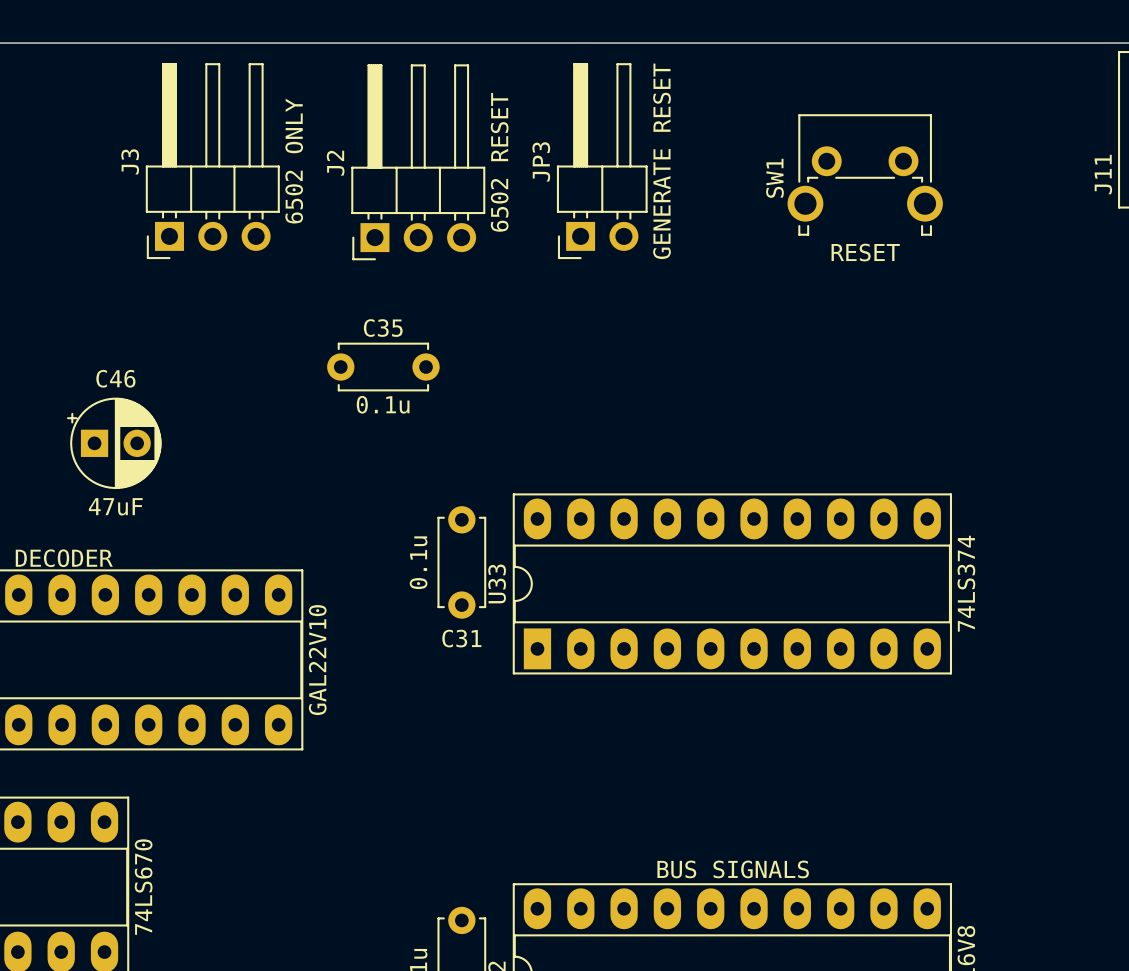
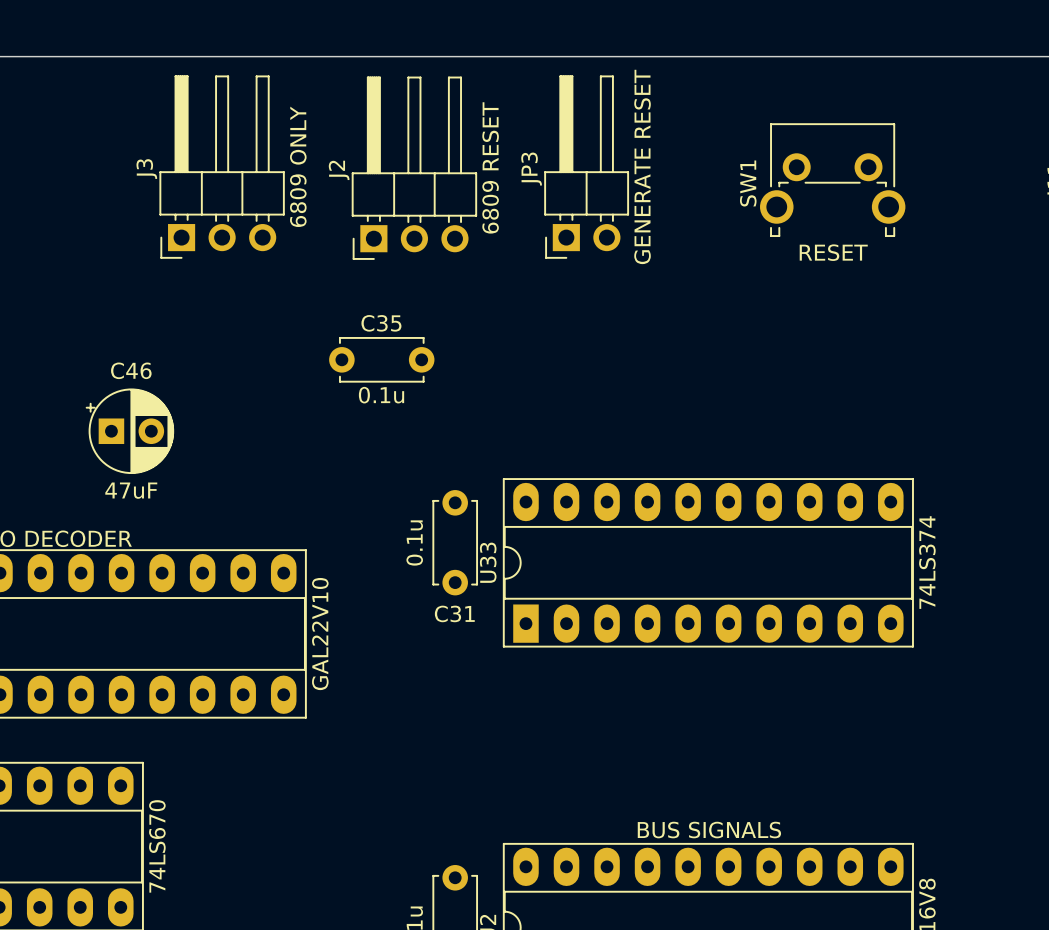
J3 value: 6502 ONLY (294, 161) -> 6809 ONLY (298, 166)
J2 value: 6502 RESET (499, 162) -> 6809 RESET (490, 167)

